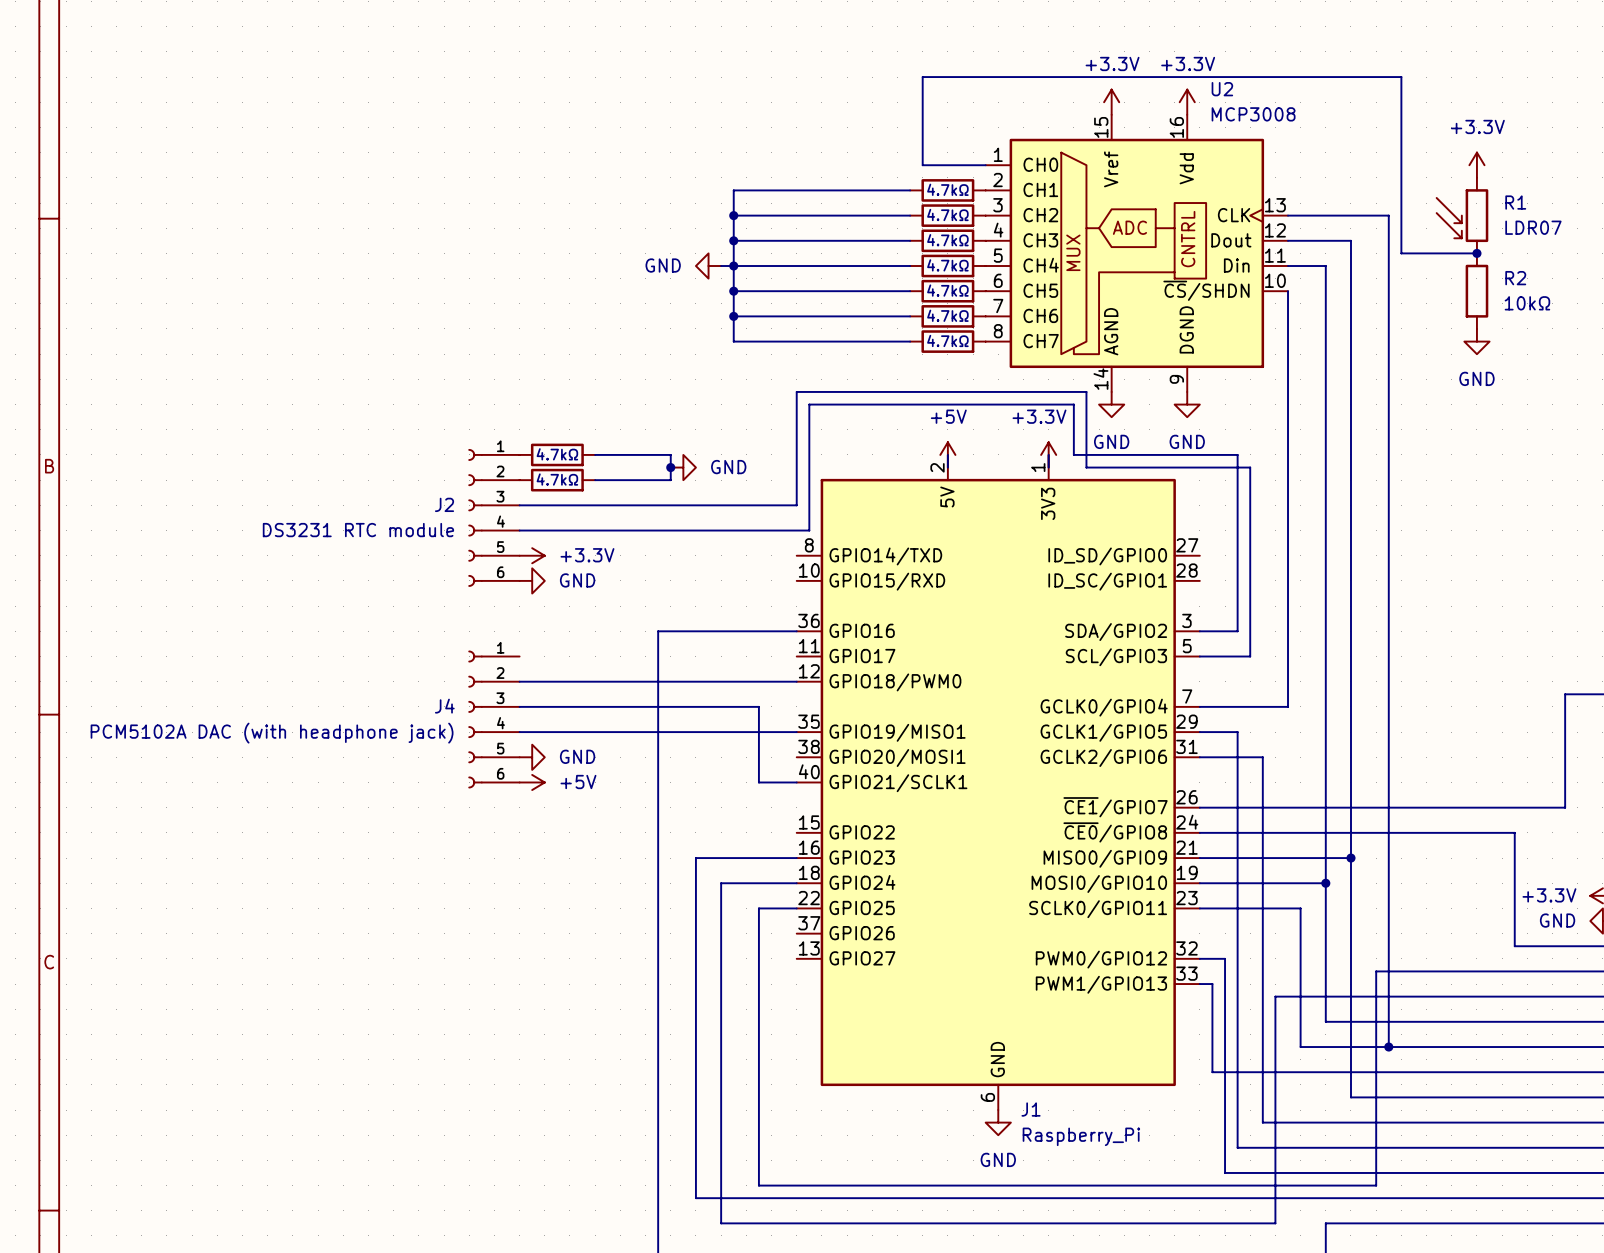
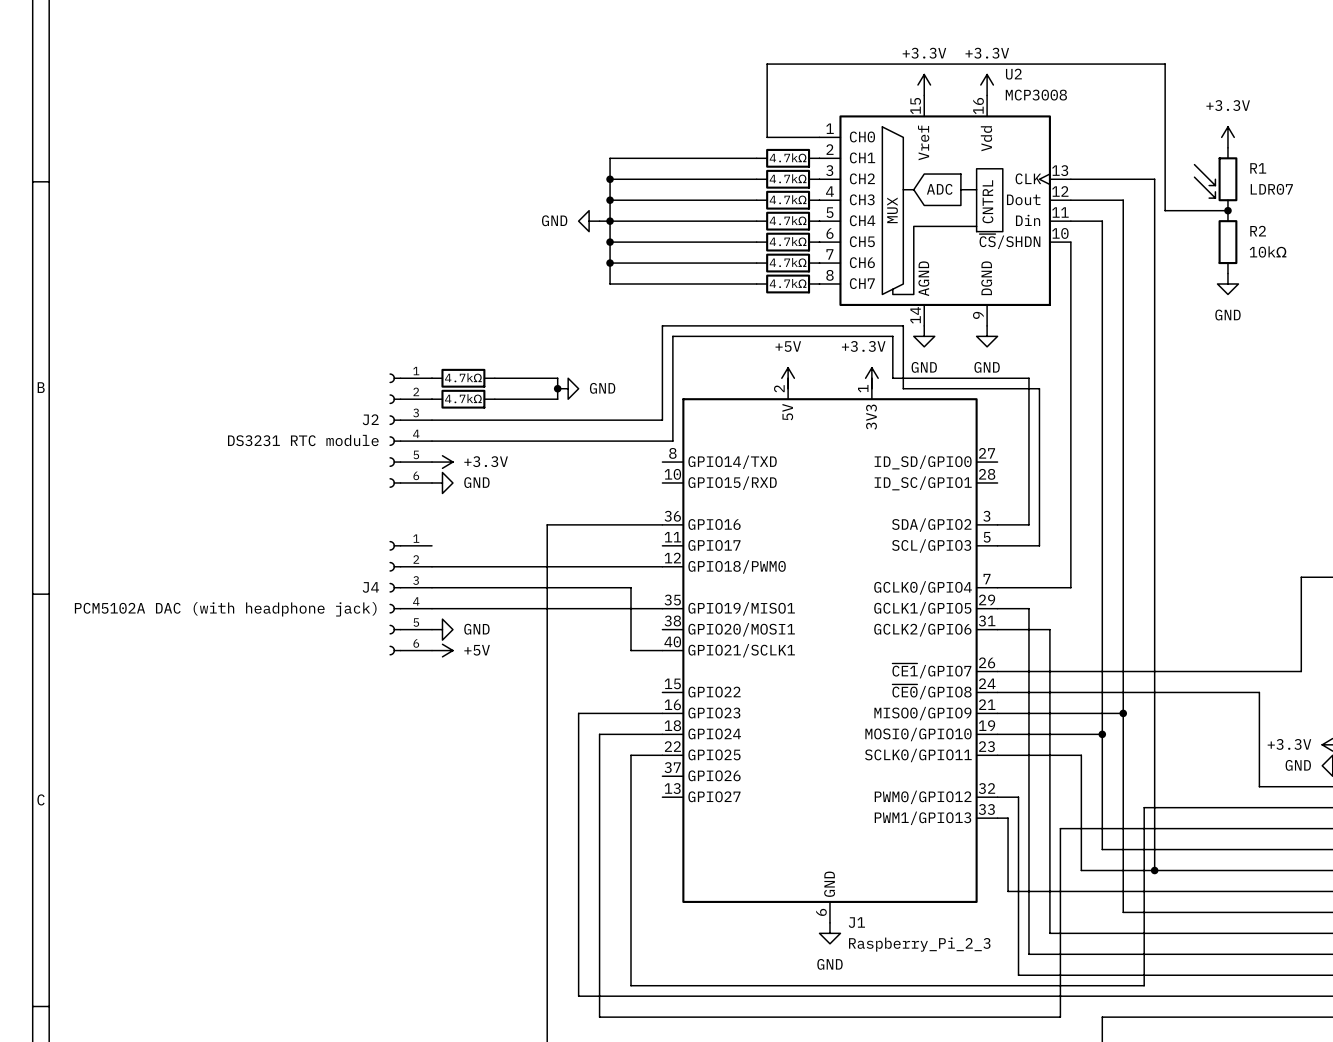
J1 value: Raspberry_Pi (1081, 1136) -> Raspberry_Pi_2_3 (919, 944)

